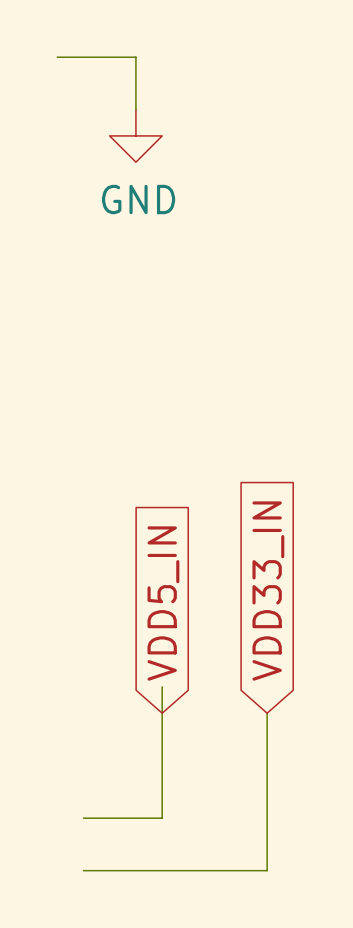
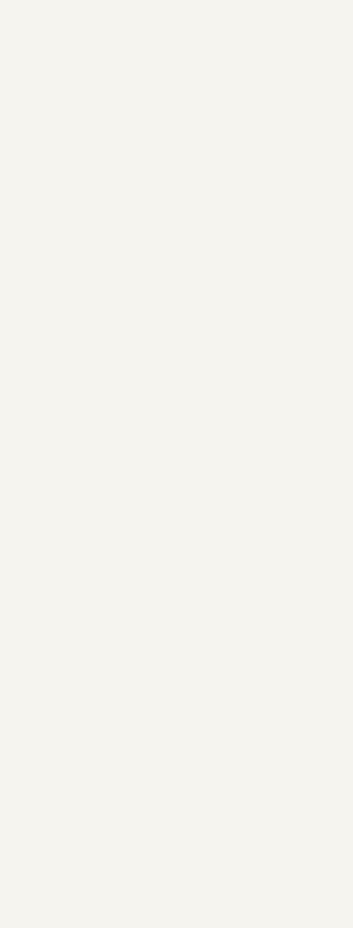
wire: (57, 57) (135, 57) (135, 109) -> none
power symbol: GND (135, 135) -> none
global label: VDD33_IN (268, 591) -> none
global label: VDD5_IN (163, 603) -> none
wire: (162, 686) (162, 818) (83, 818) -> none
wire: (267, 713) (267, 870) (83, 870) -> none

